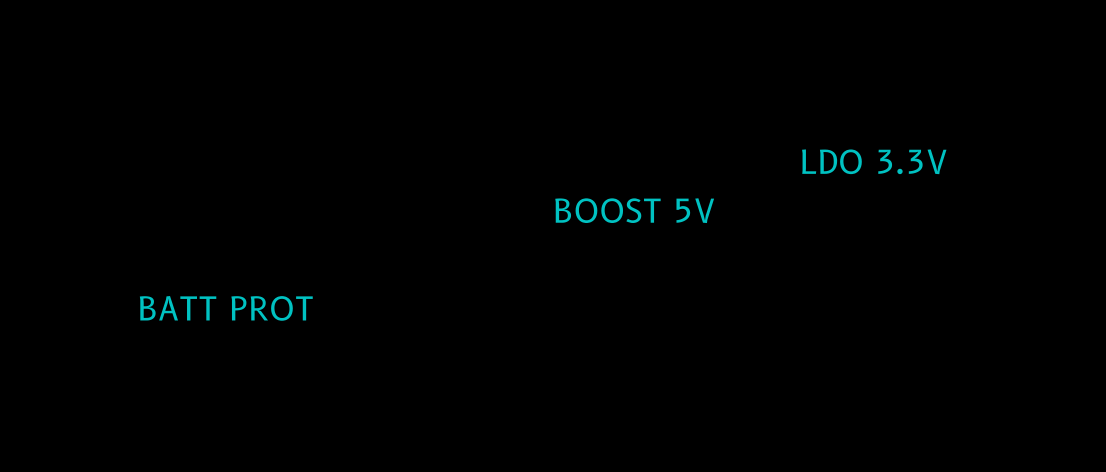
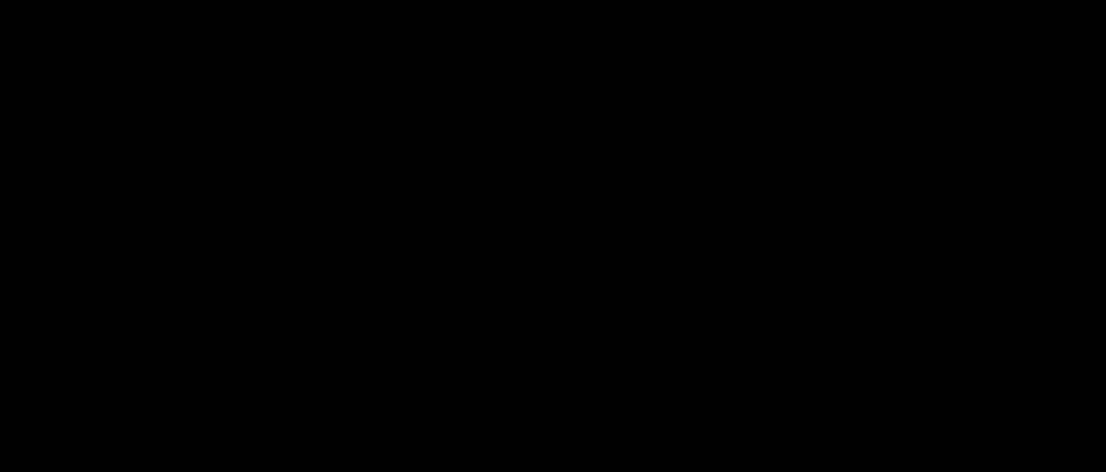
text: LDO 3.3V (874, 161) -> none
text: BOOST 5V (634, 210) -> none
text: BATT PROT (226, 308) -> none

